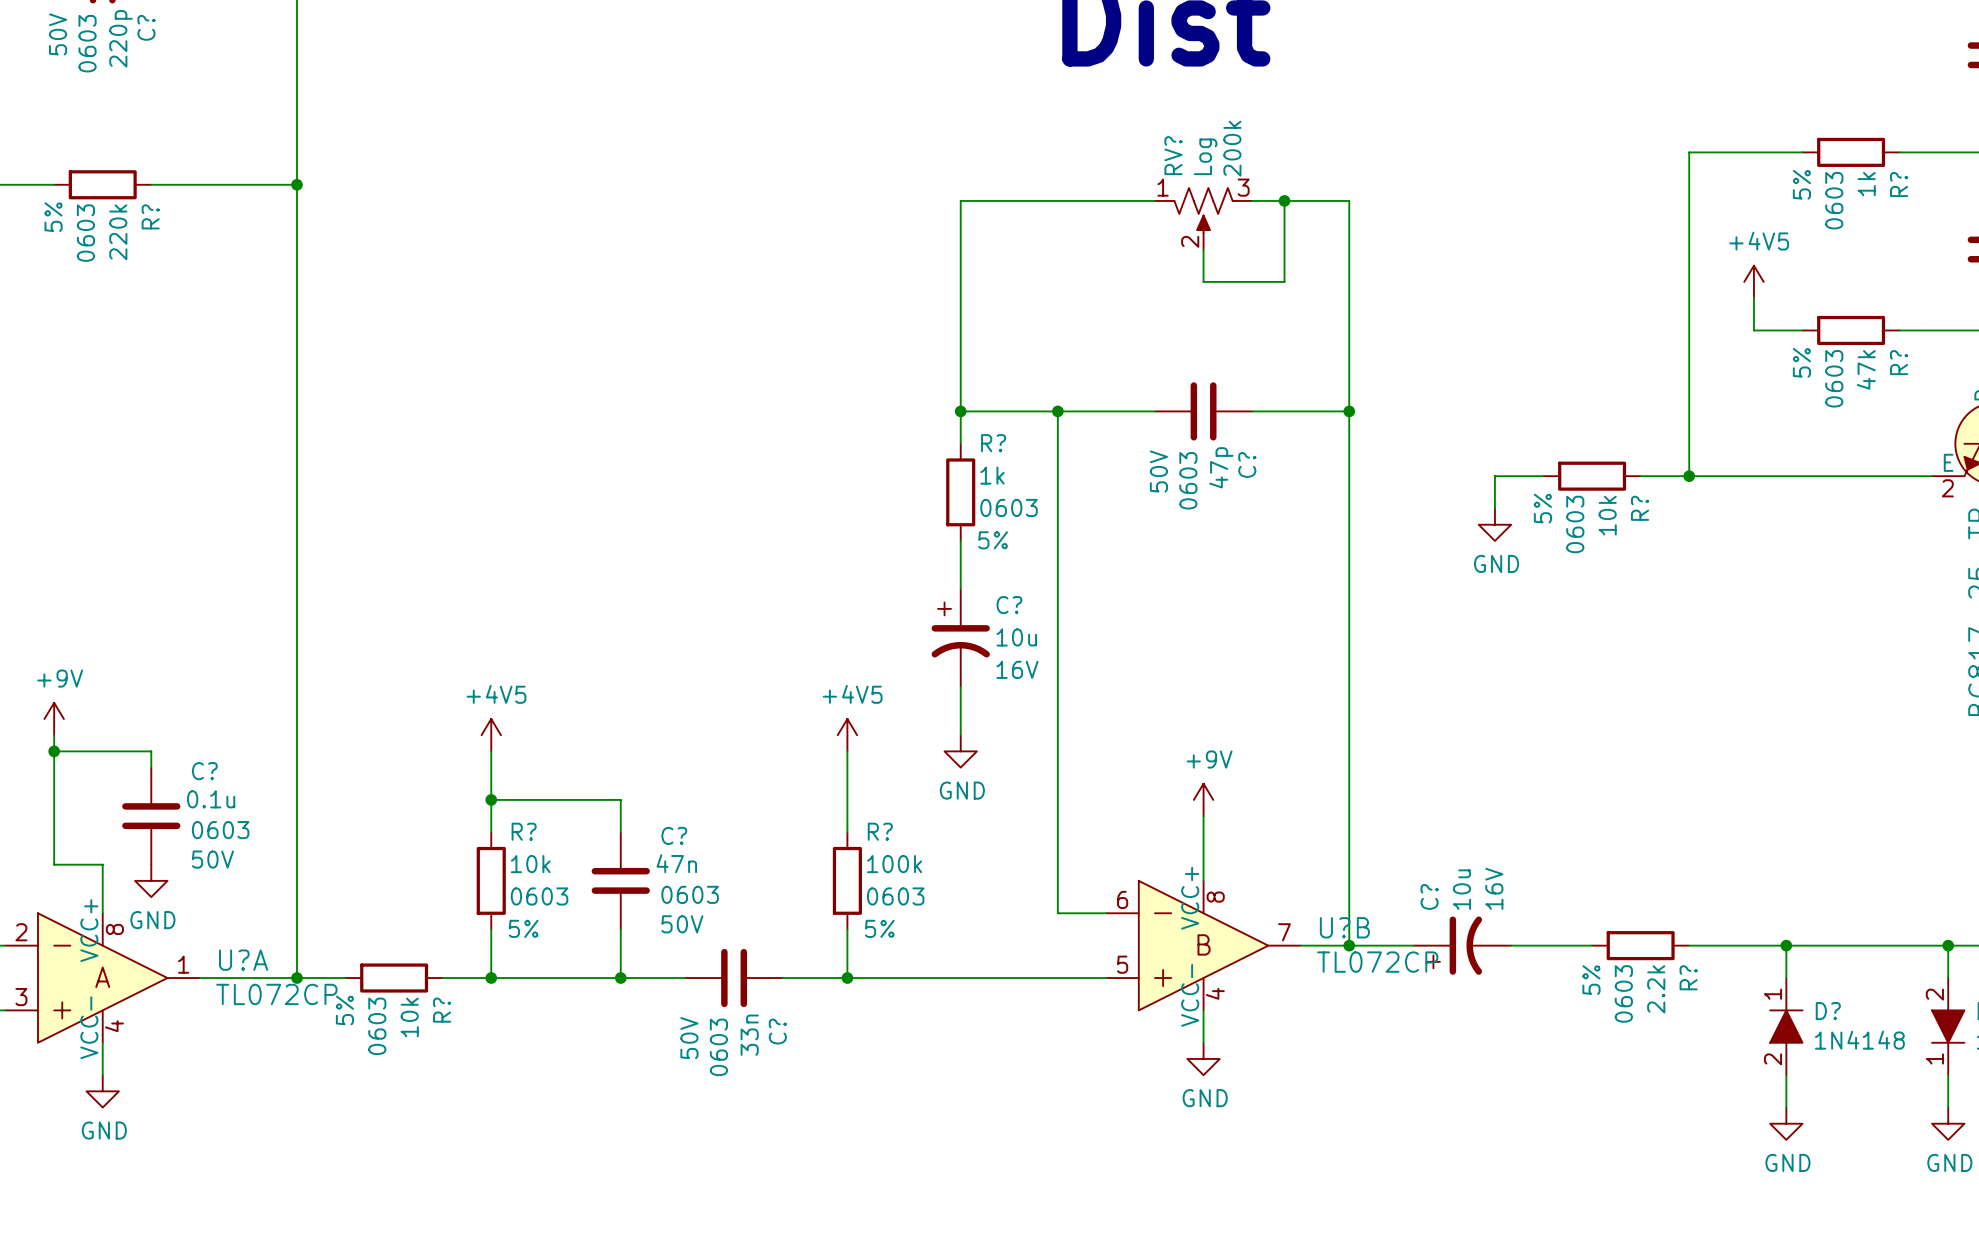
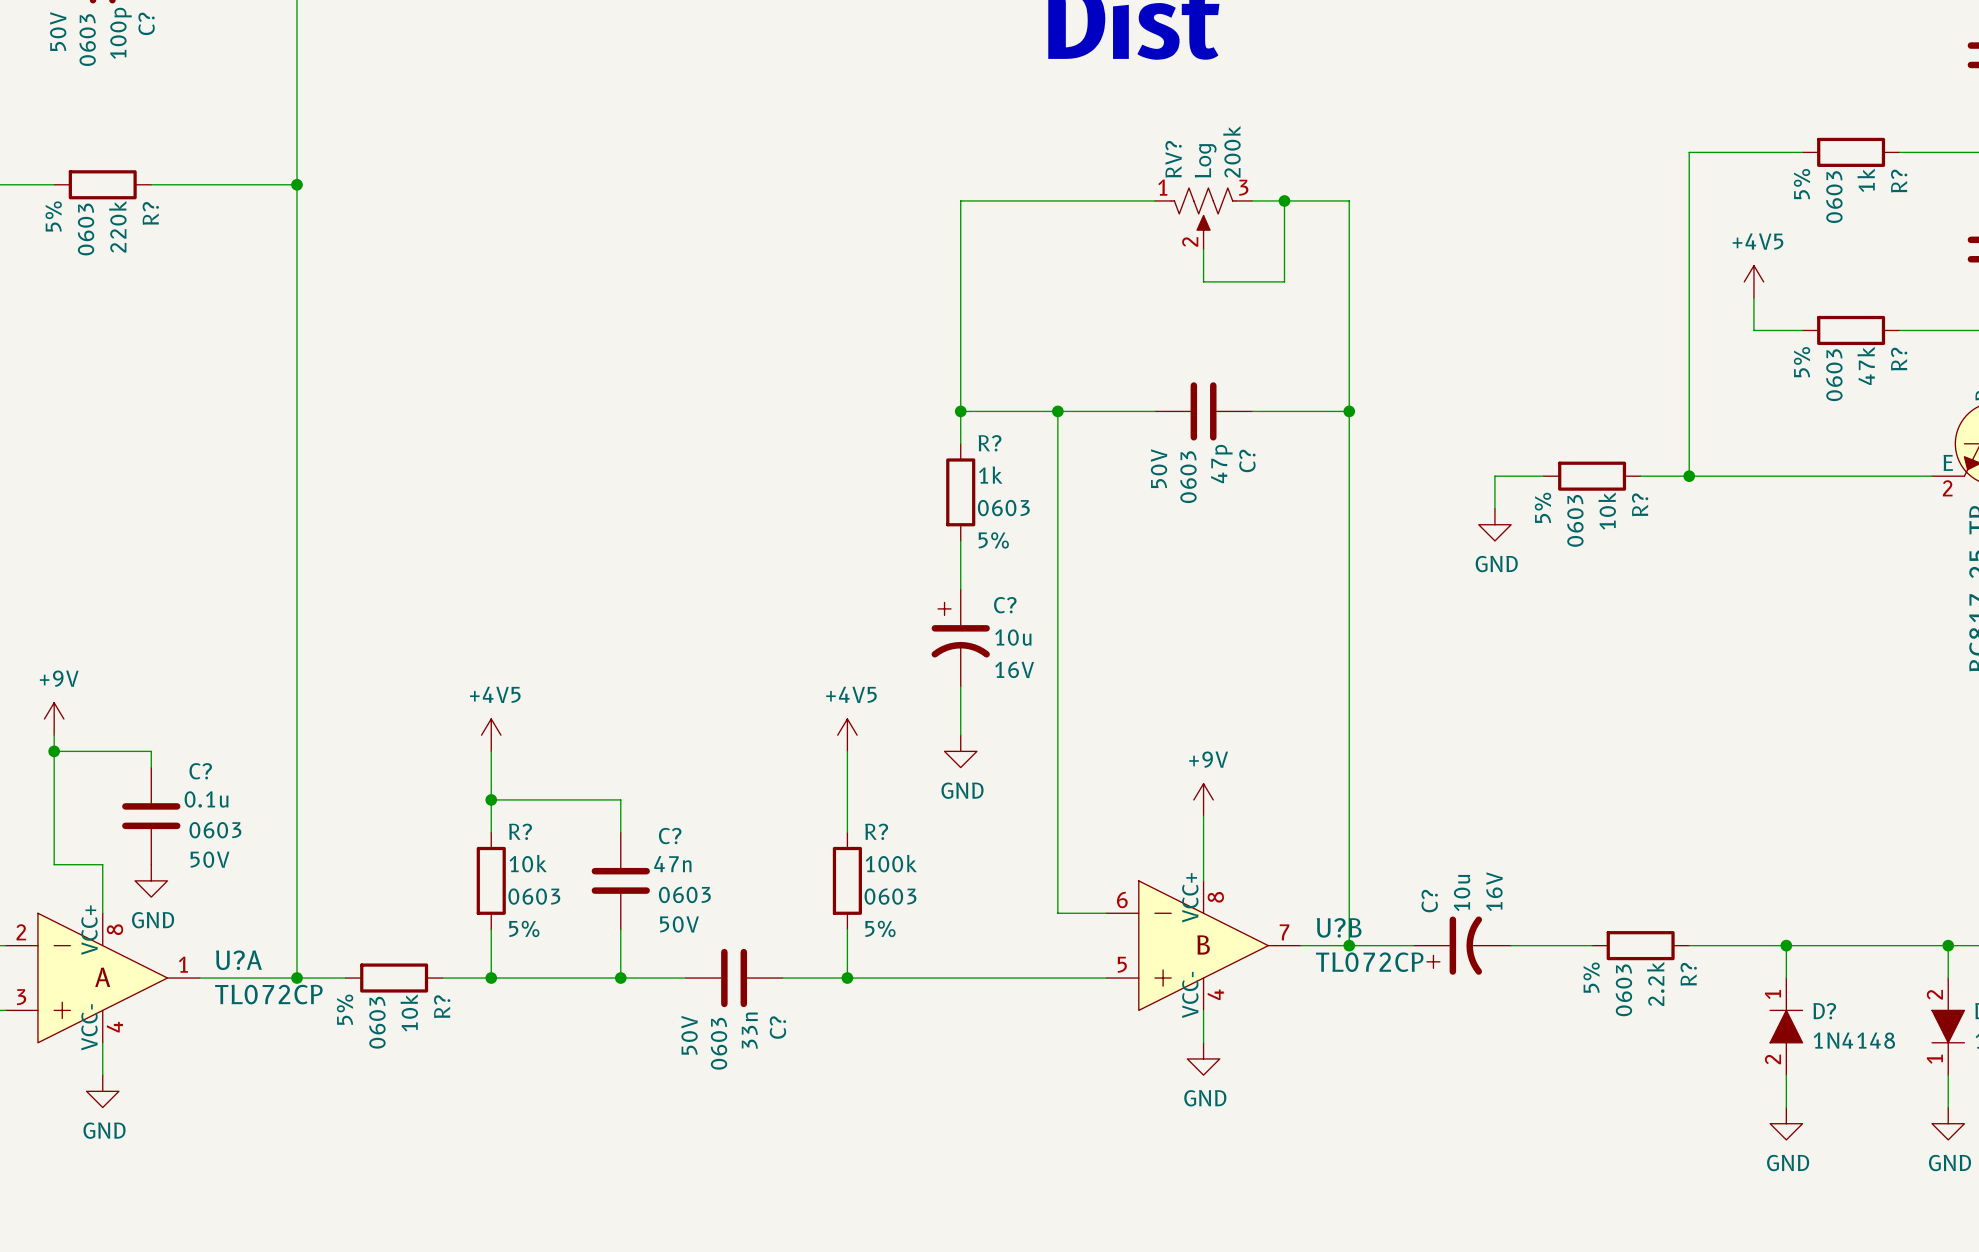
C? value: 220p (121, 38) -> 100p (120, 33)

